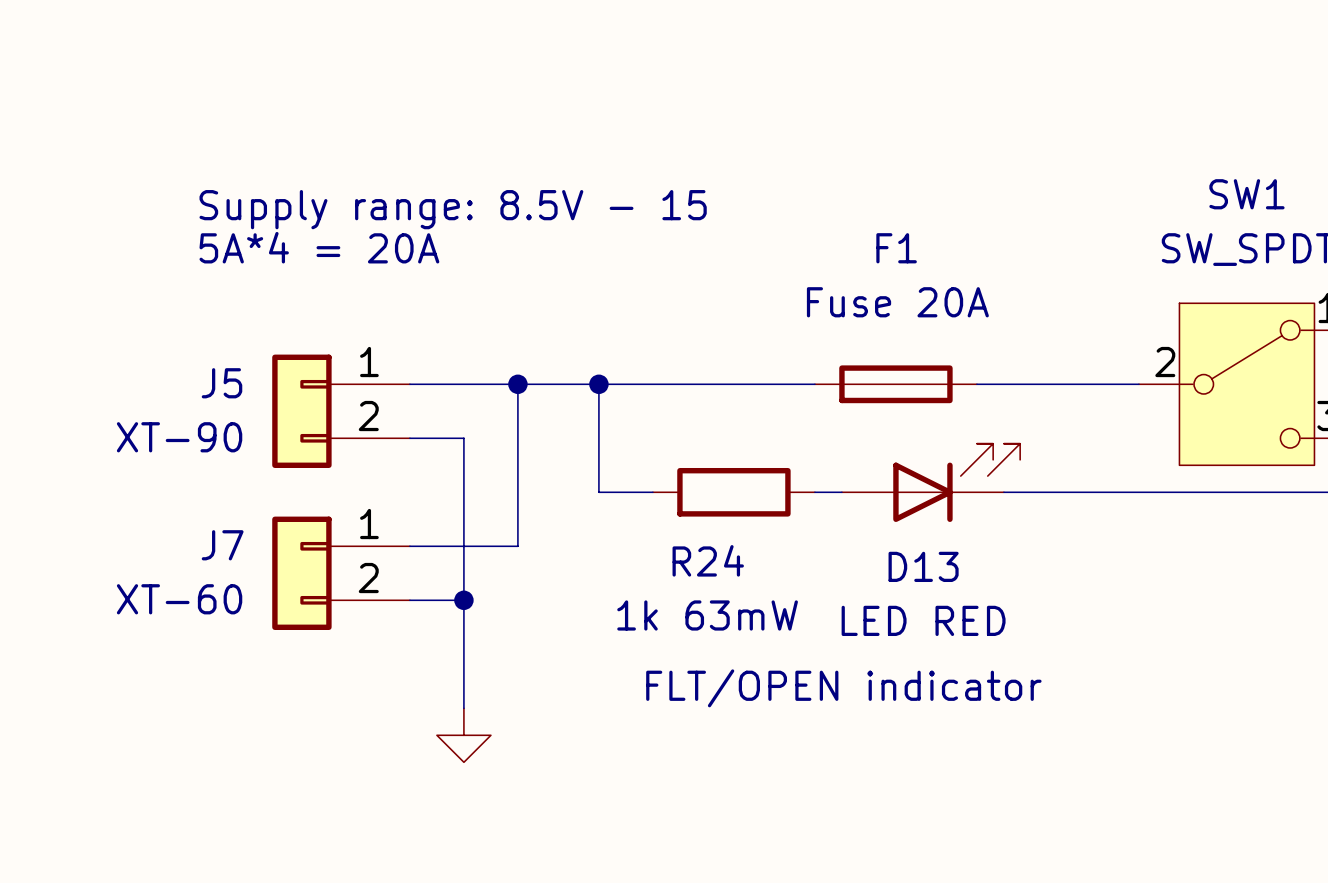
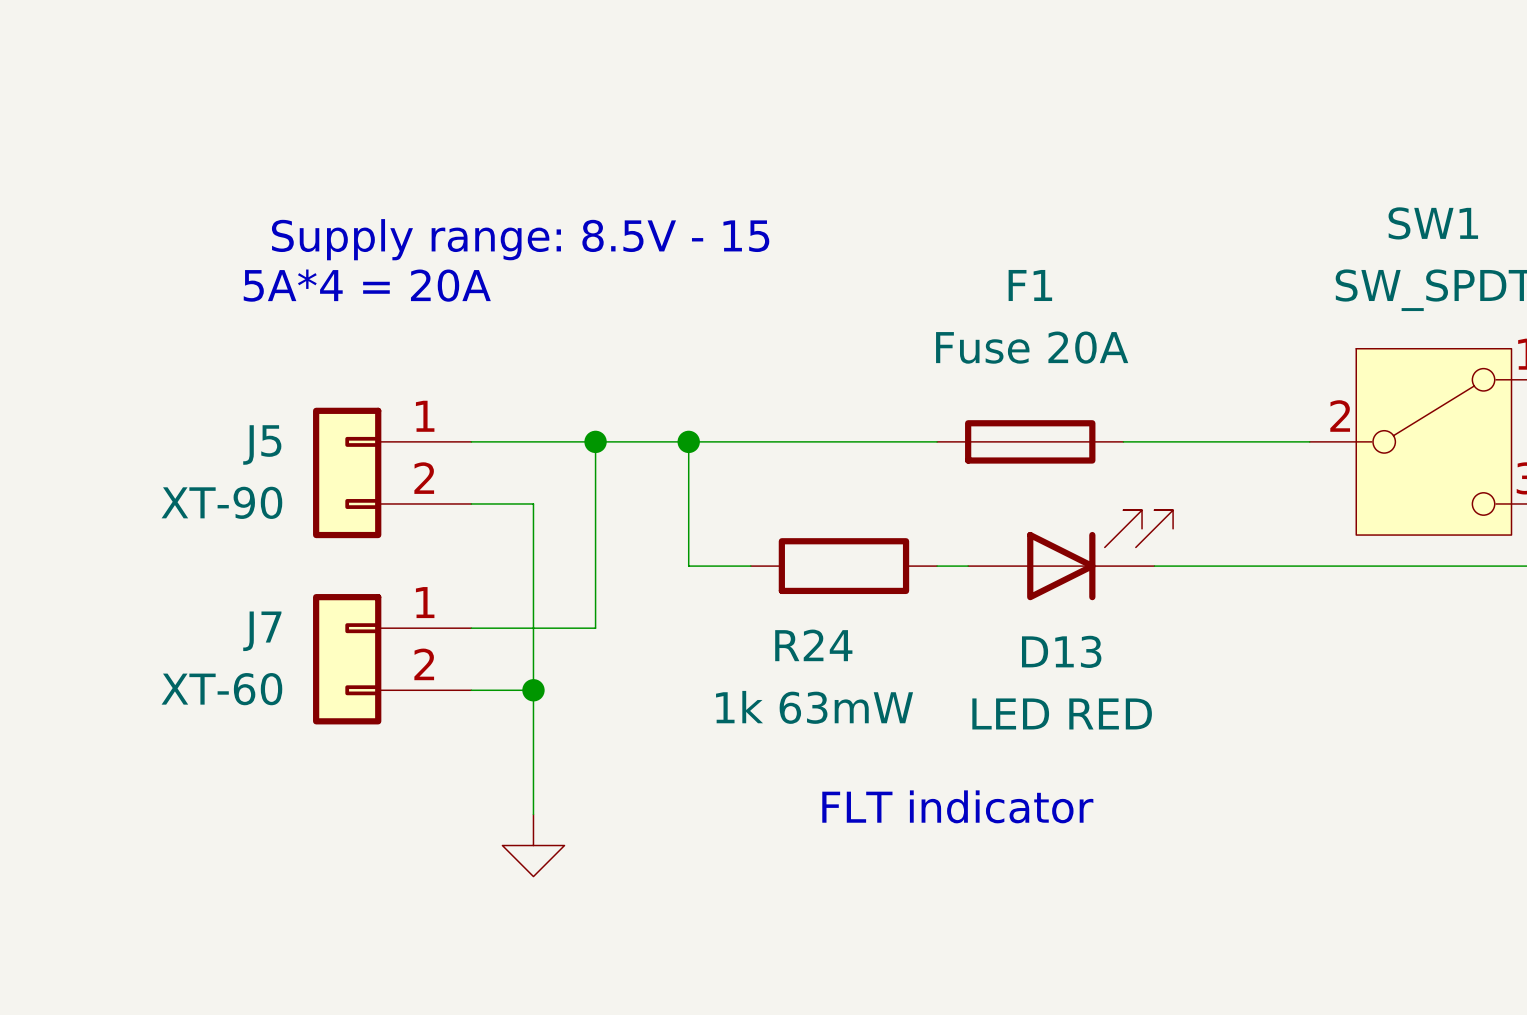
text: FLT/OPEN indicator (843, 688) -> FLT indicator (957, 806)

